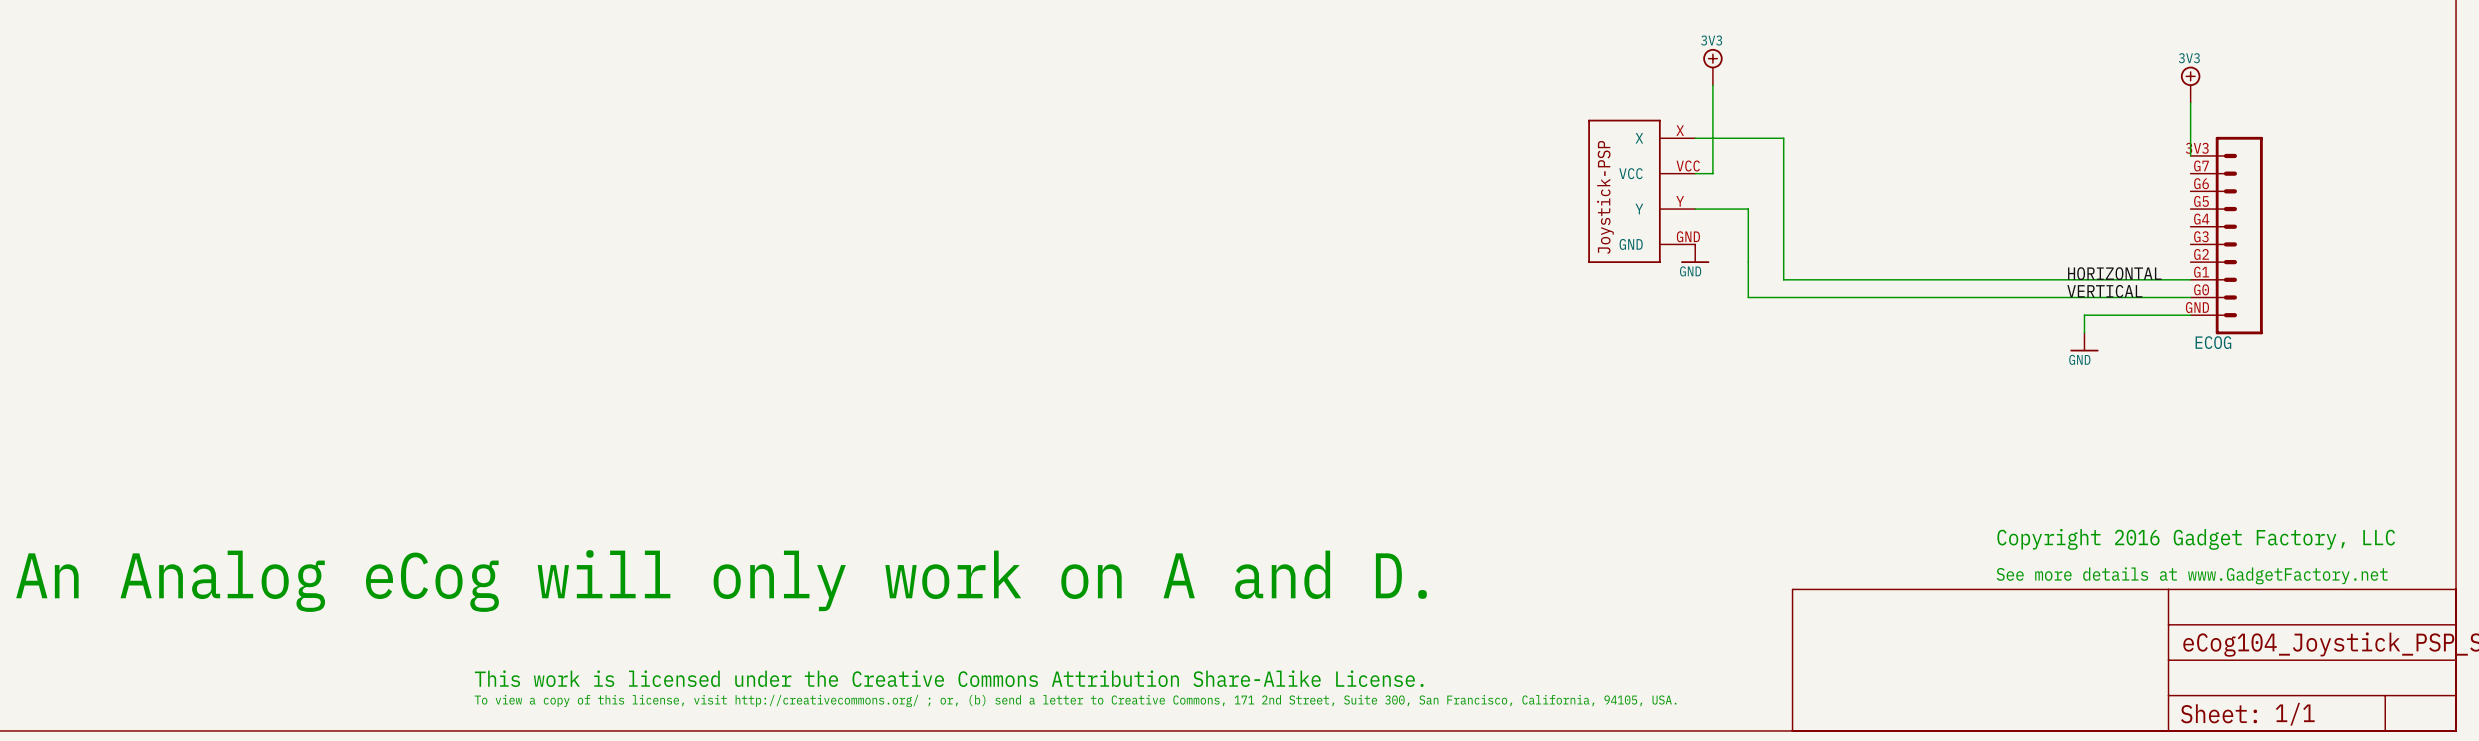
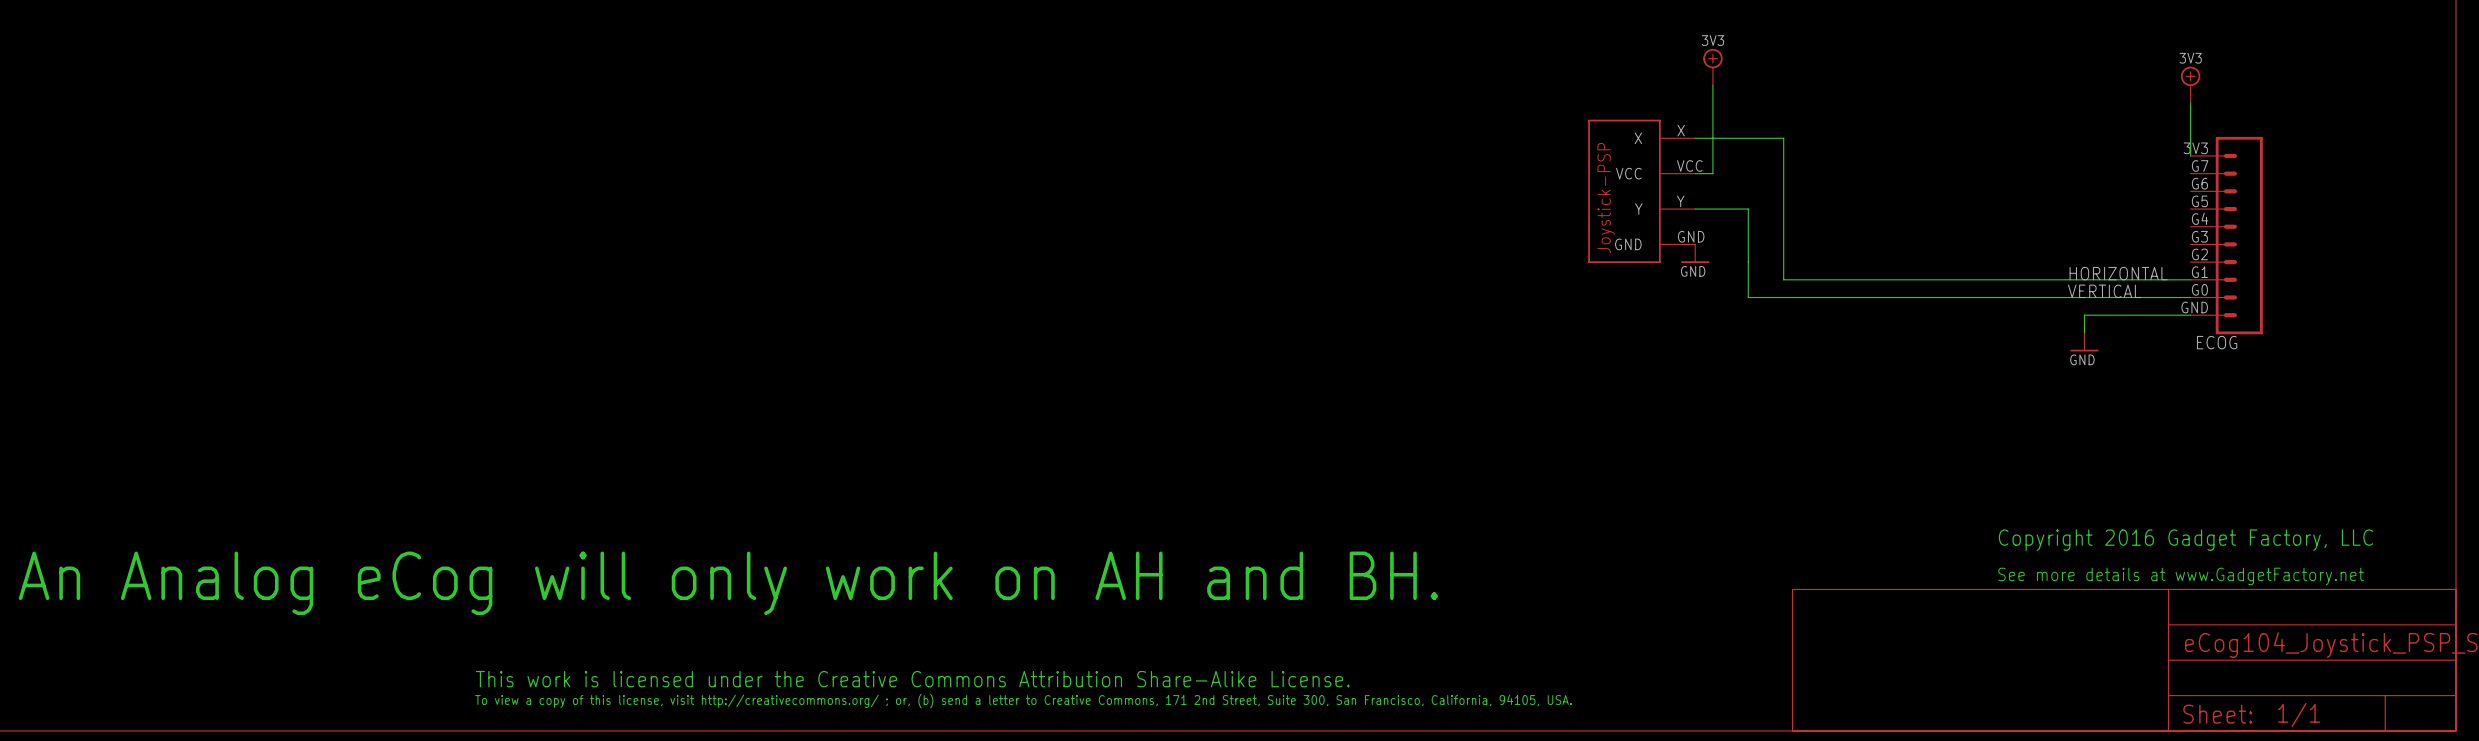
text: An Analog eCog will only work on A and D. (721, 581) -> An Analog eCog will only work on AH and BH. (728, 583)

